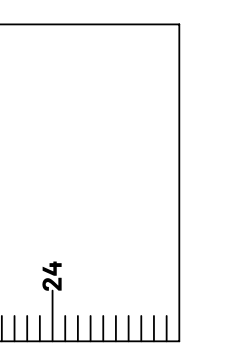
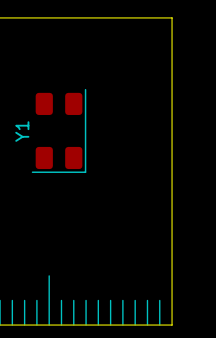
Y1: none -> (59, 130)
text: 24 (52, 276) -> none

